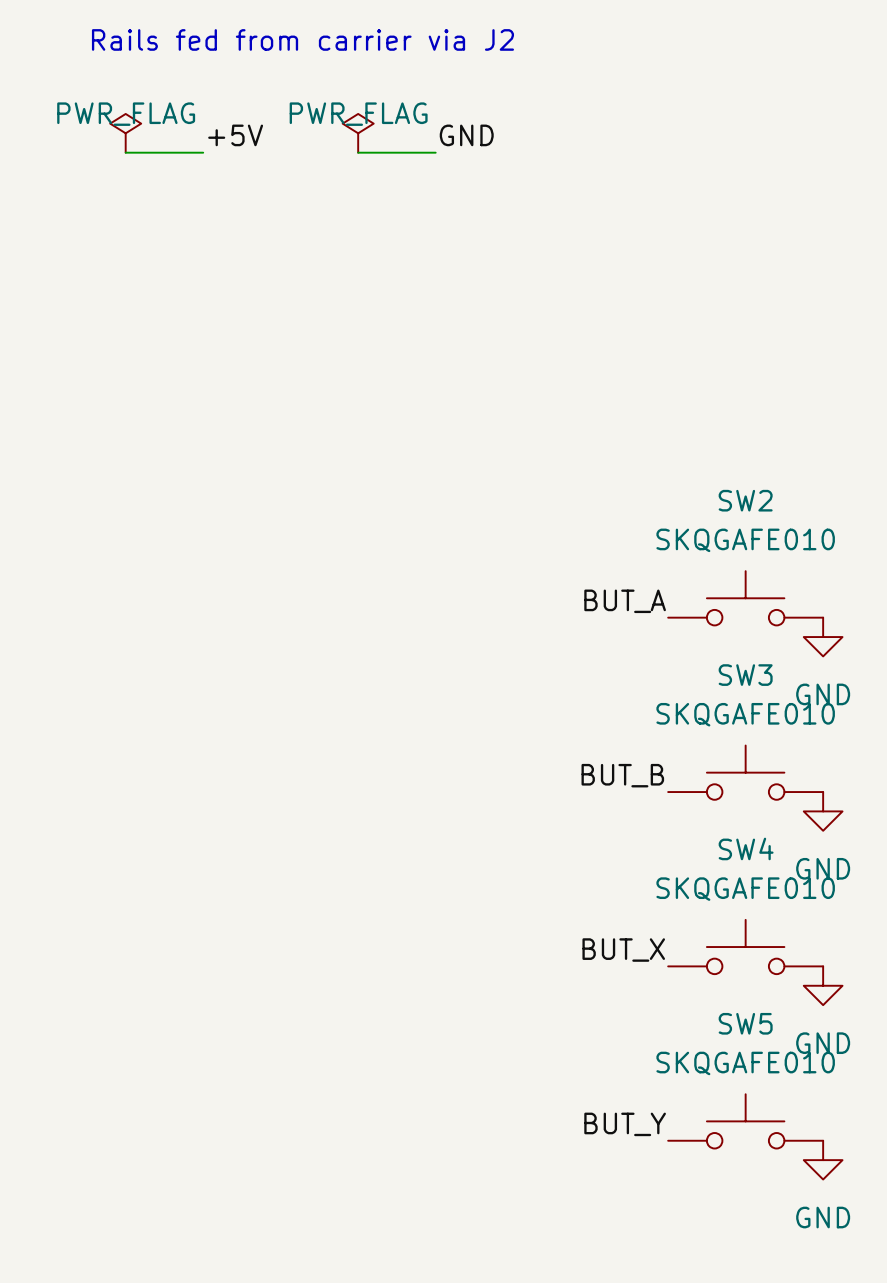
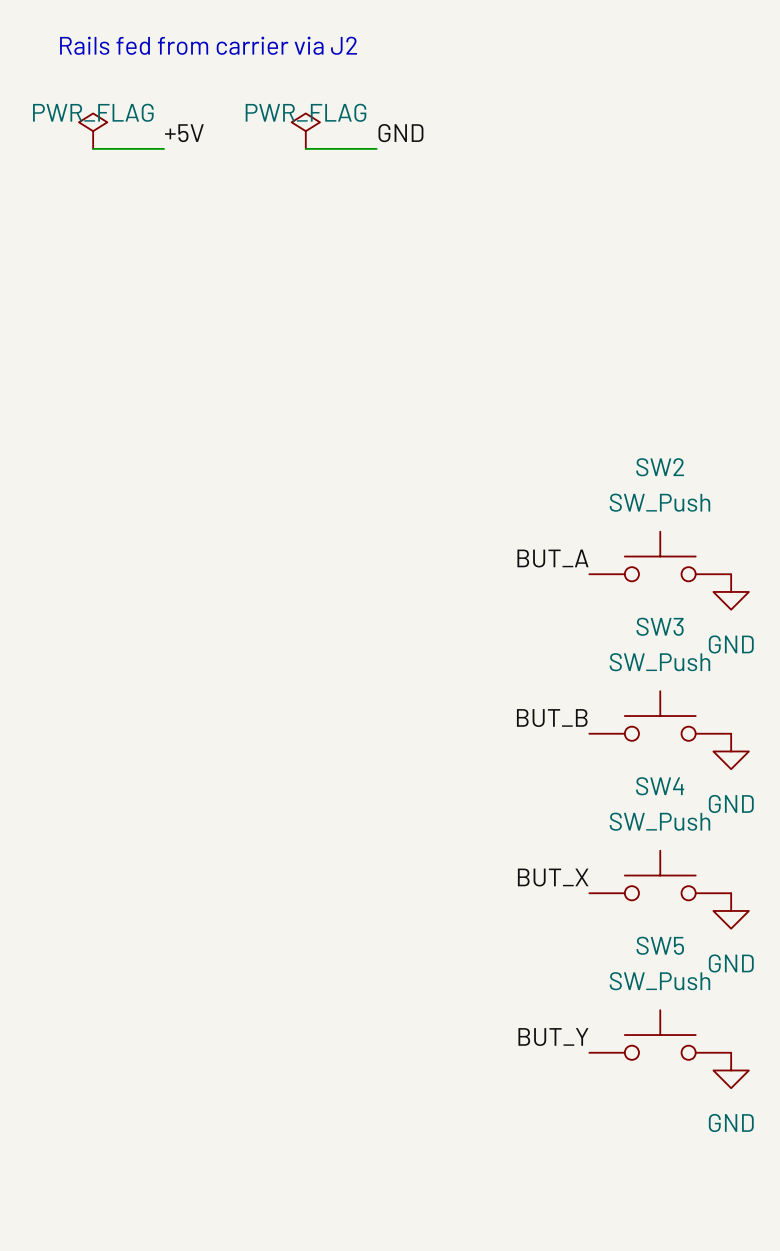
SW2 value: SKQGAFE010 (745, 540) -> SW_Push (659, 502)
SW3 value: SKQGAFE010 (745, 714) -> SW_Push (659, 662)
SW4 value: SKQGAFE010 (745, 889) -> SW_Push (659, 821)
SW5 value: SKQGAFE010 (745, 1063) -> SW_Push (659, 981)

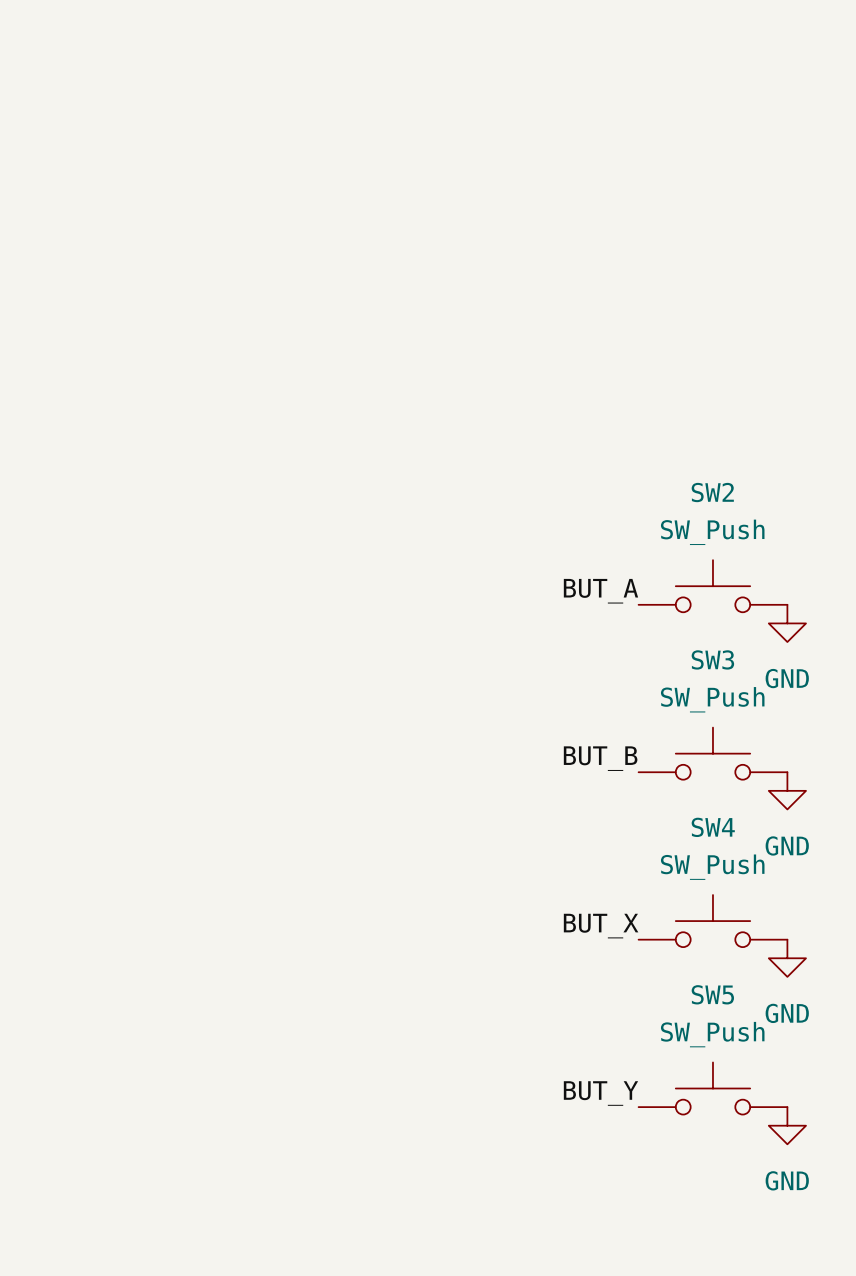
text: Rails fed from carrier via J2 (208, 45) -> none
power symbol: PWR_FLAG (93, 131) -> none
power symbol: PWR_FLAG (305, 131) -> none
label: +5V (184, 133) -> none
label: GND (400, 133) -> none
wire: (93, 148) (164, 148) -> none
wire: (305, 148) (376, 148) -> none

